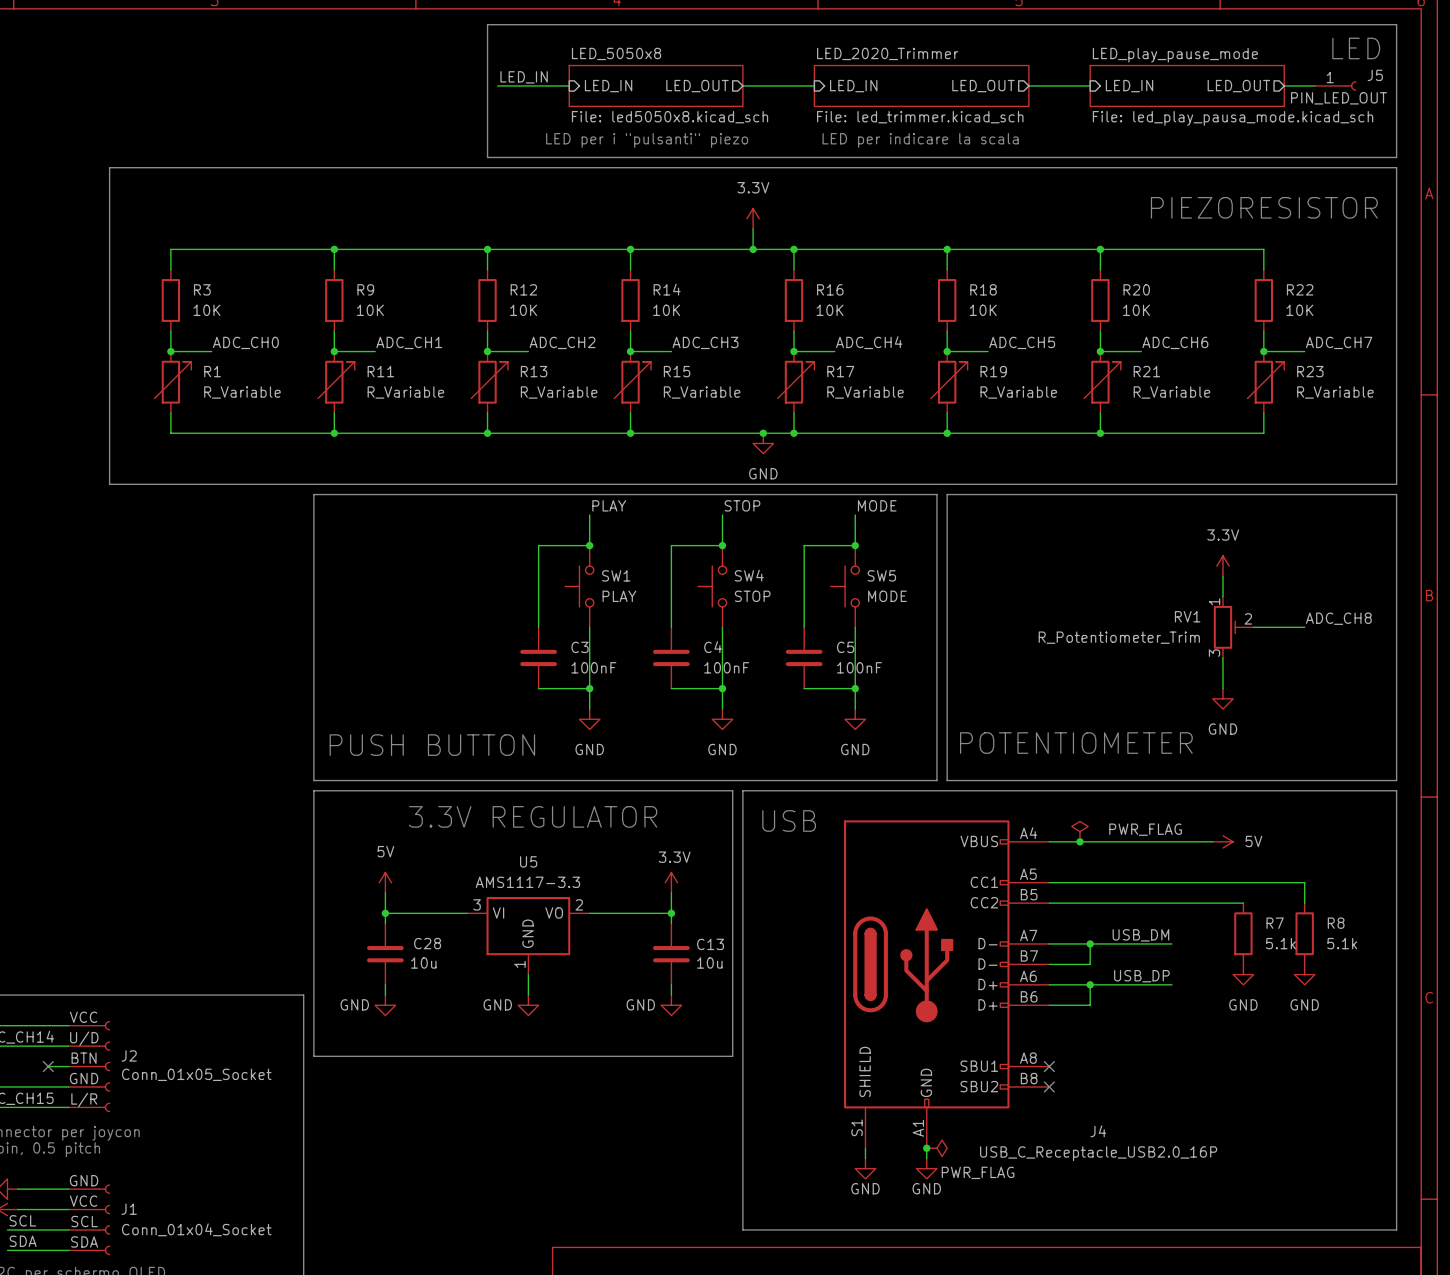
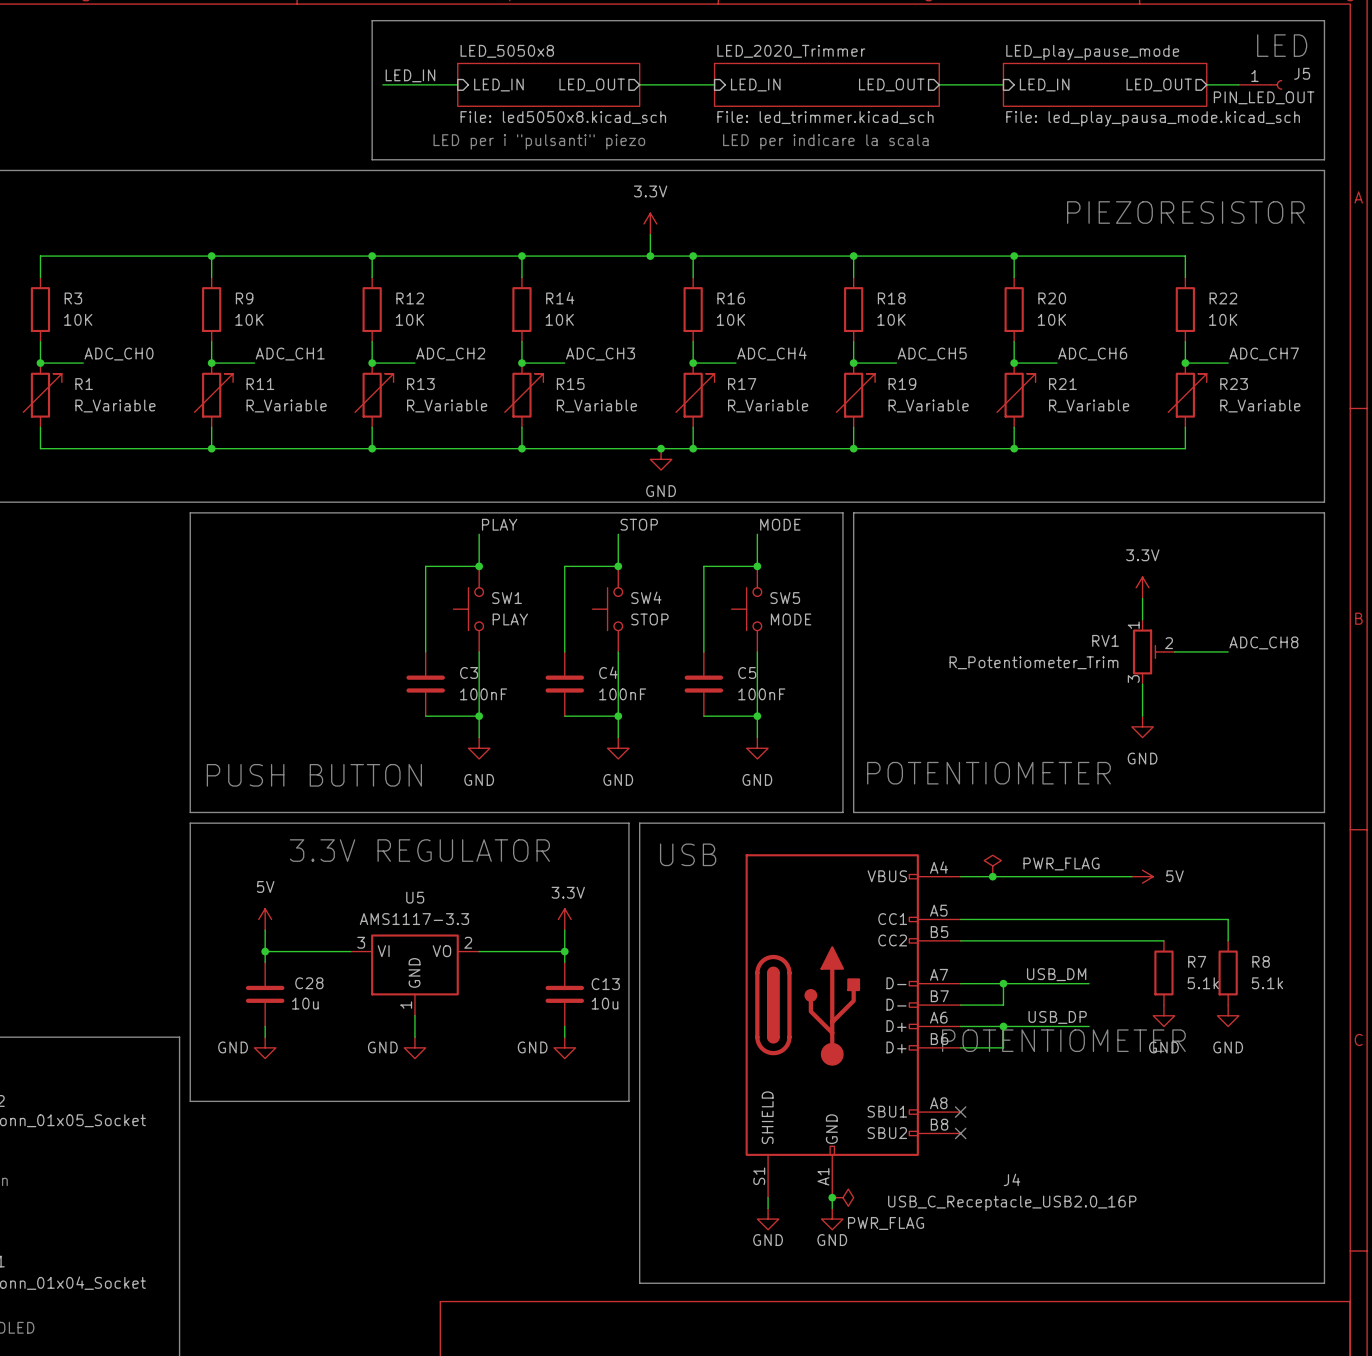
text: none -> POTENTIOMETER (1063, 1040)

